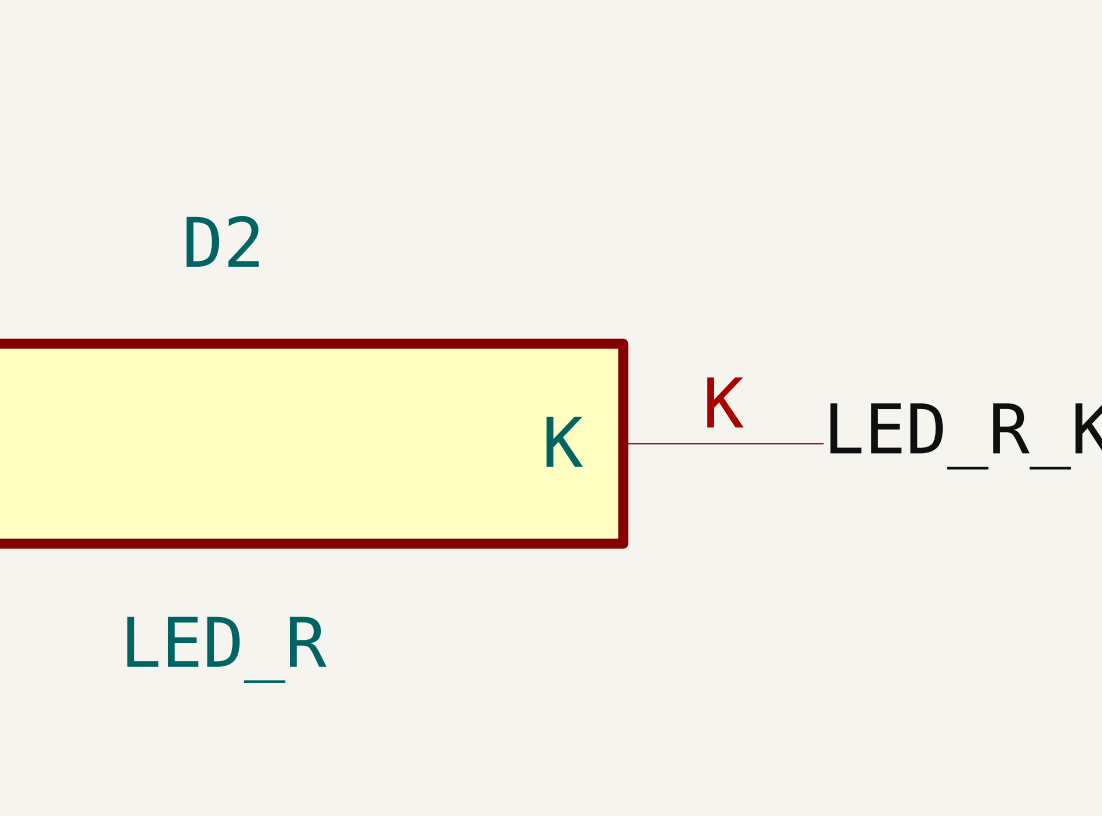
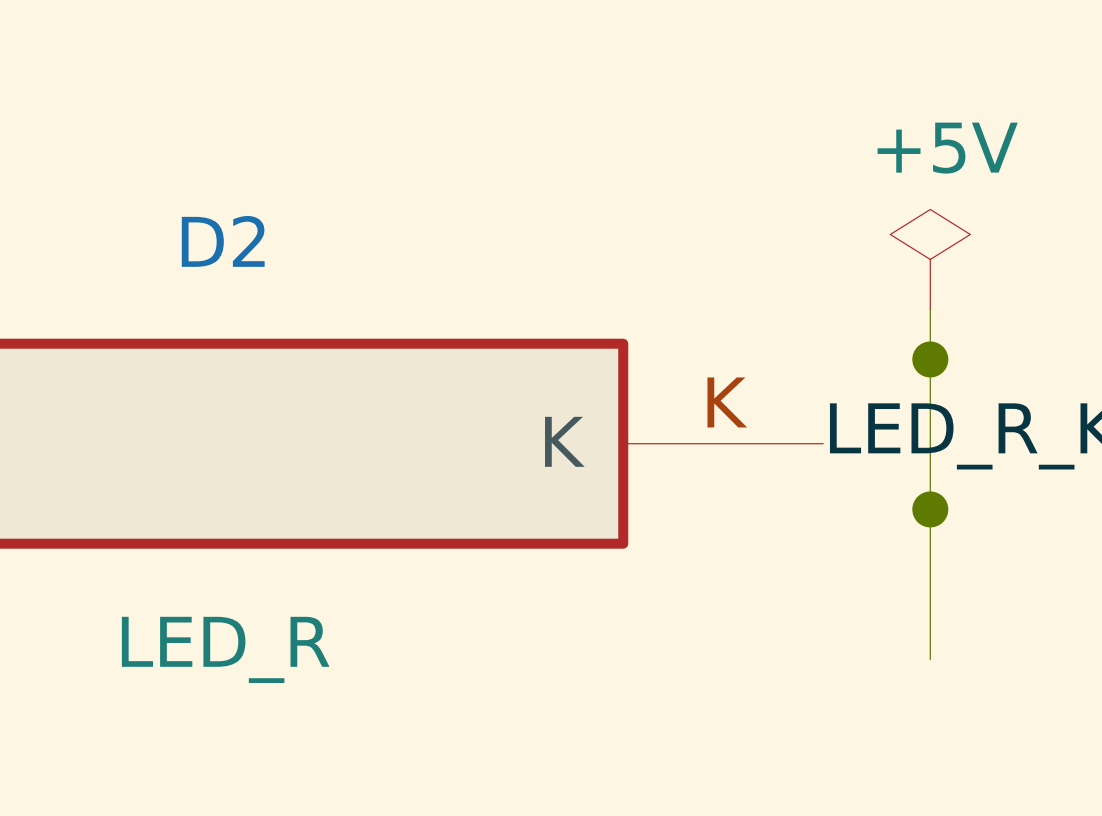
power symbol: none -> +5V (930, 259)
wire: none -> (930, 309) (930, 659)
junction: none -> (930, 359)
junction: none -> (930, 509)

